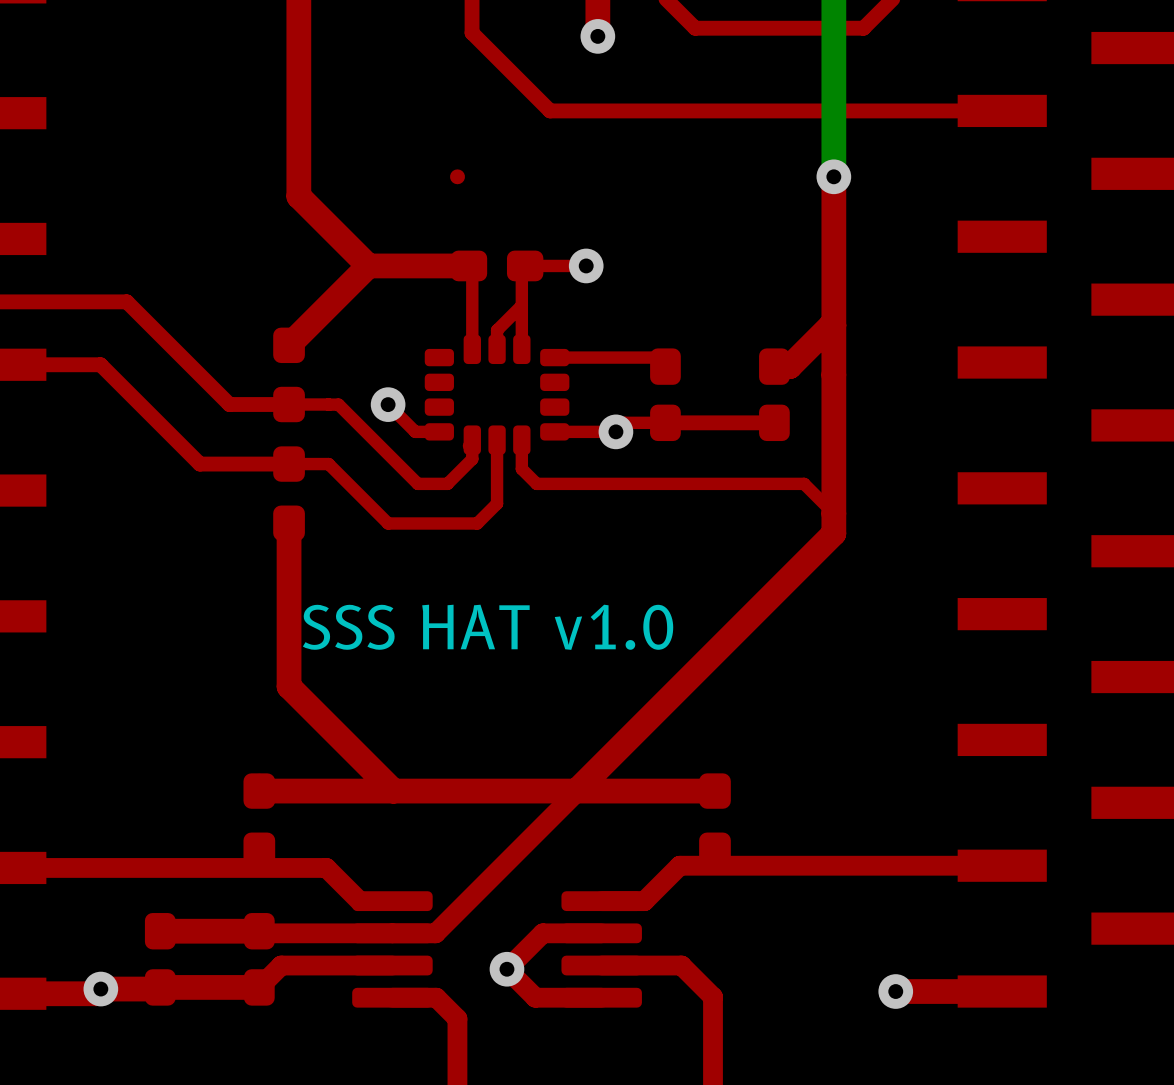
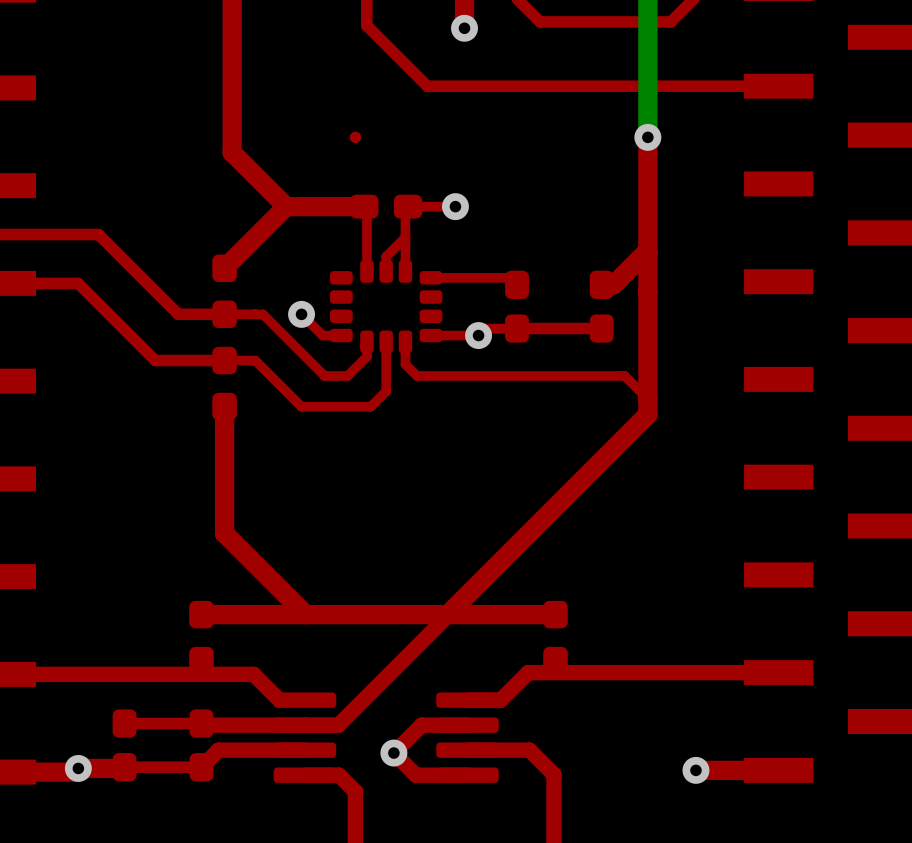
text: SSS HAT v1.0 (488, 627) -> none
top track width: thick (259, 931) (160, 931) -> thin (201, 723) (124, 723)
top track width: thick (259, 987) (160, 987) -> thin (201, 767) (124, 767)

